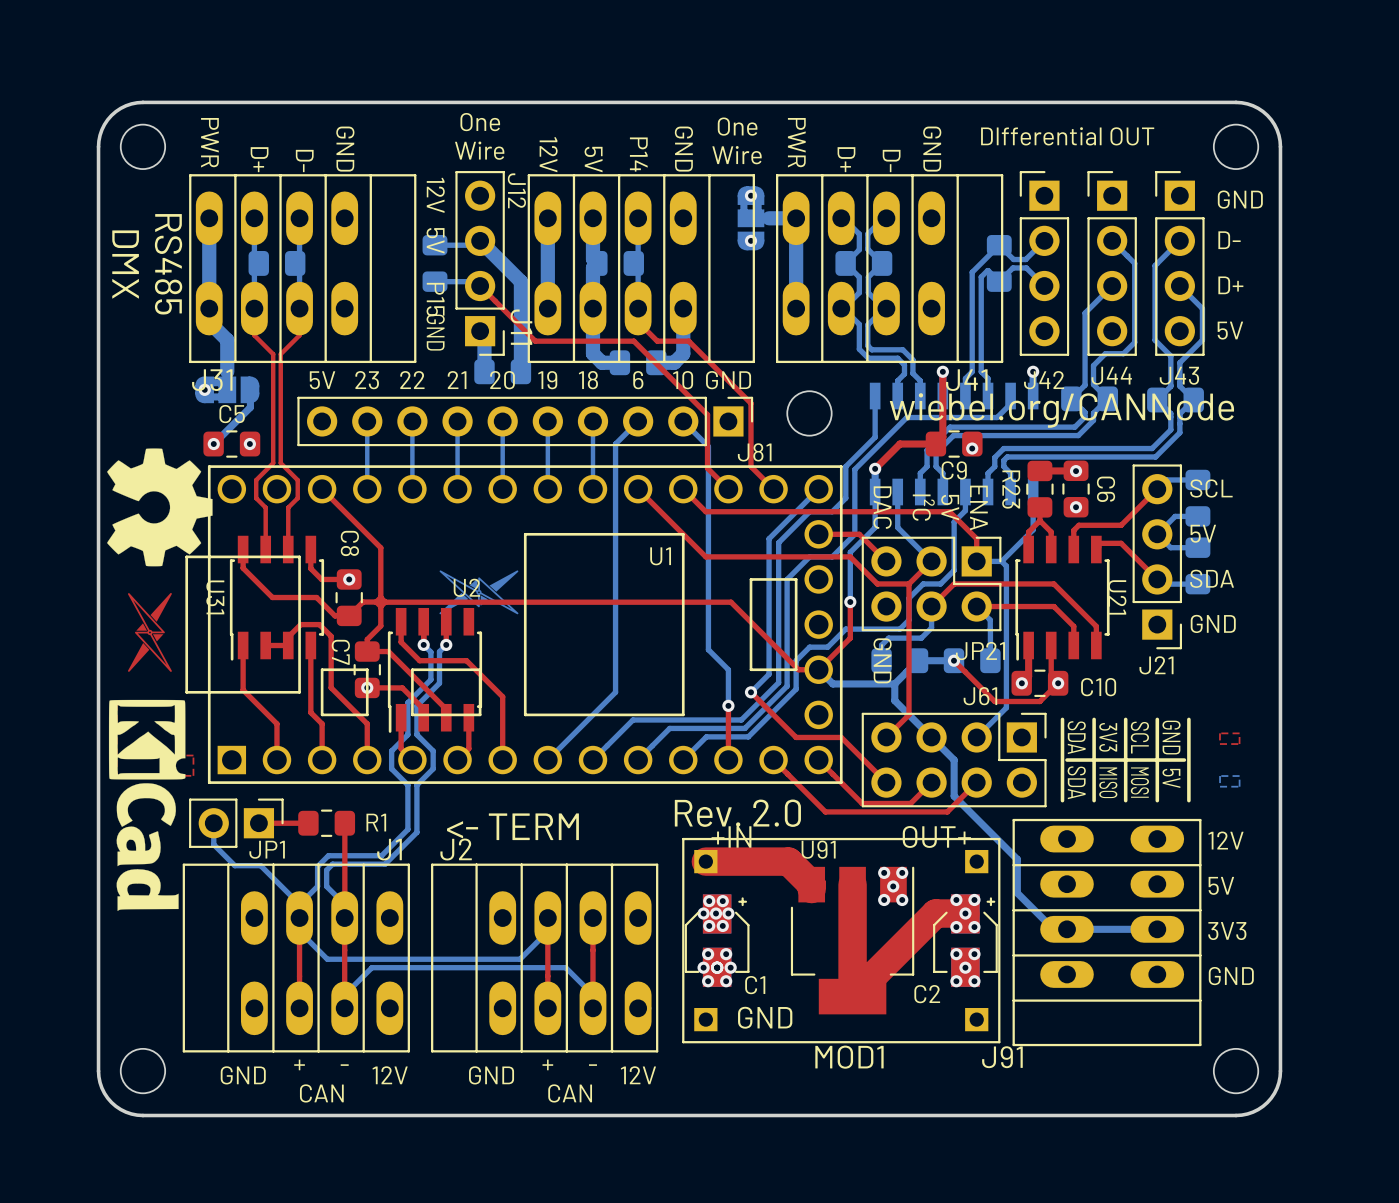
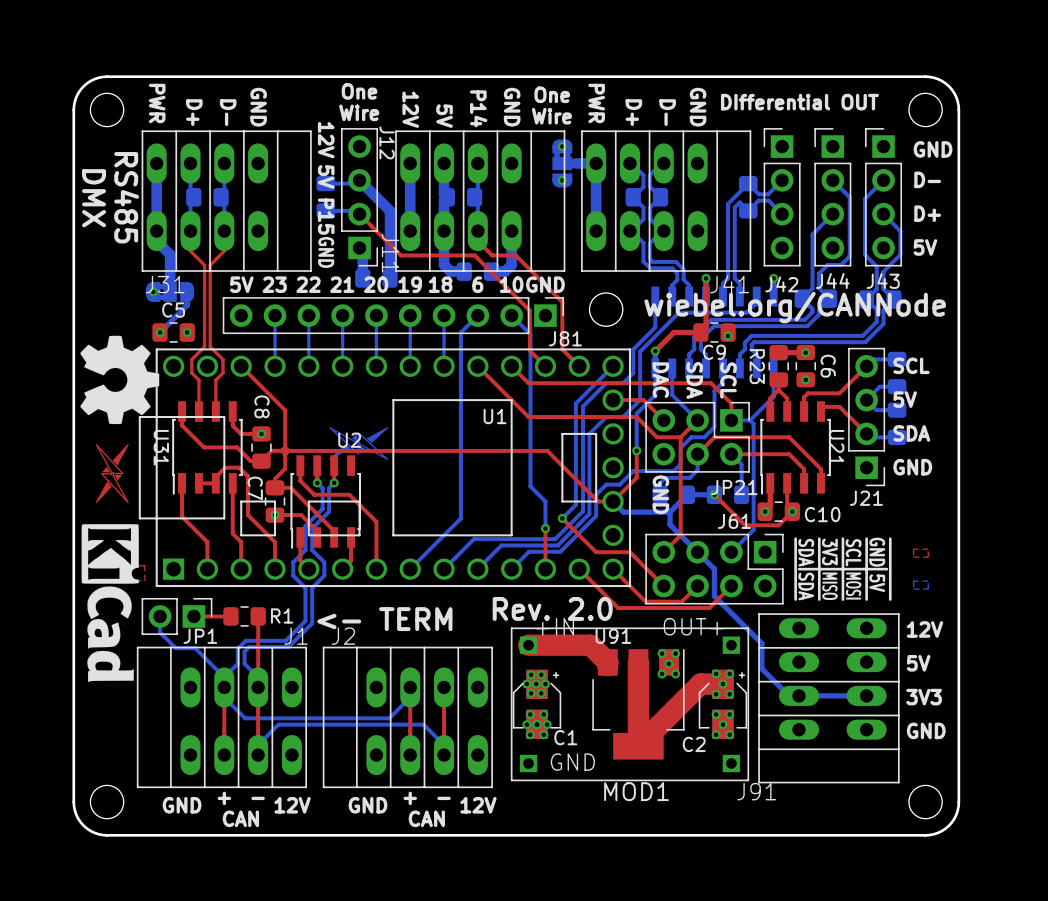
text: I²C (923, 507) -> SDA (694, 380)
text: 5V (950, 507) -> none
text: ENA (978, 507) -> SCL (728, 380)

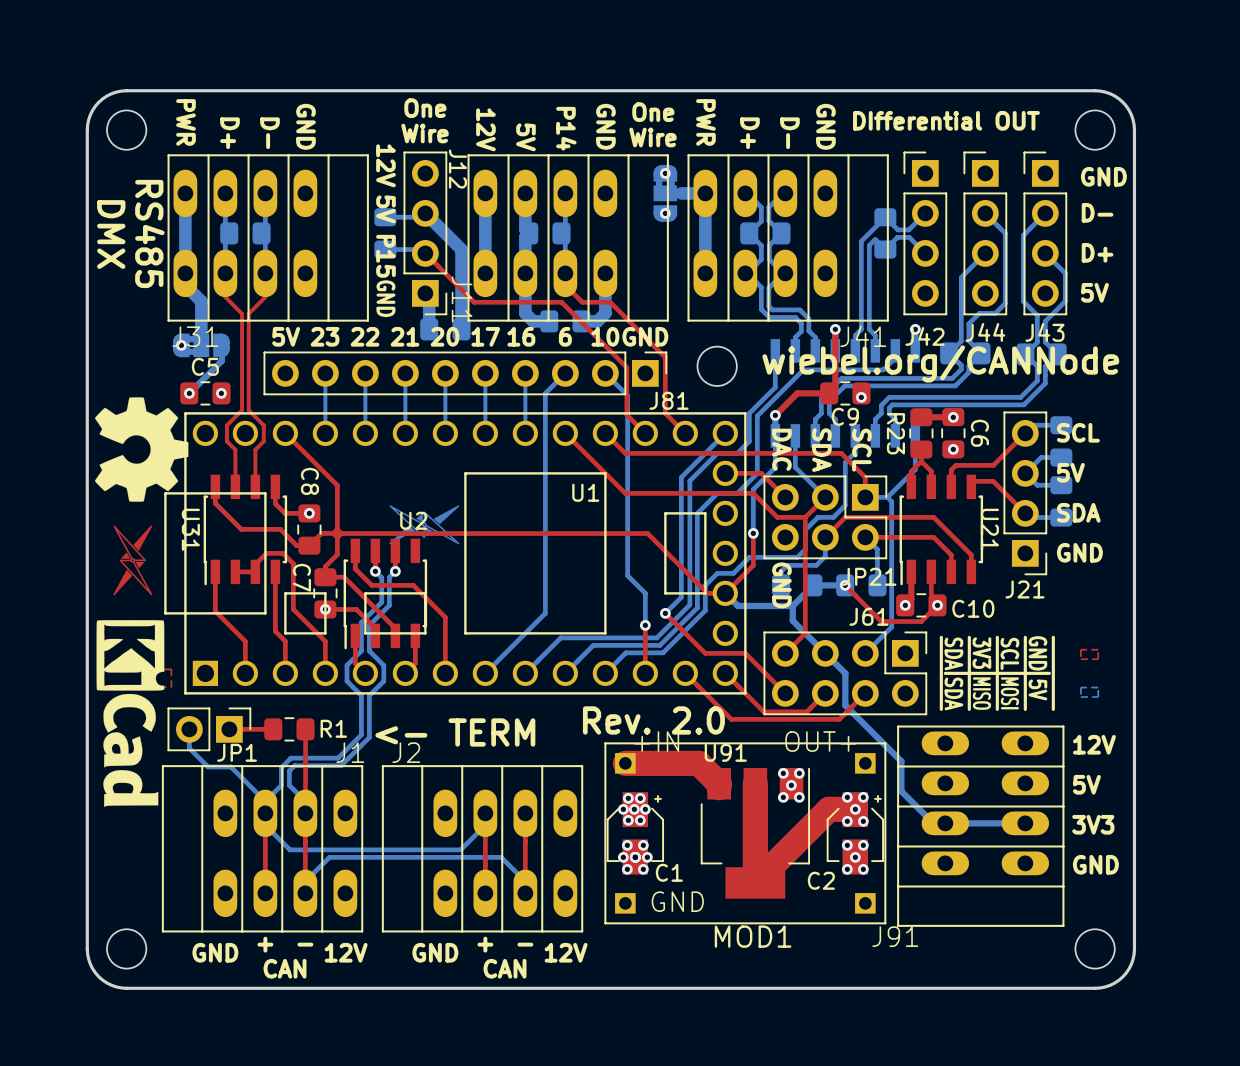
text: 19 (410, 284) -> 17 (485, 336)
text: 18 (440, 284) -> 16 (521, 336)

